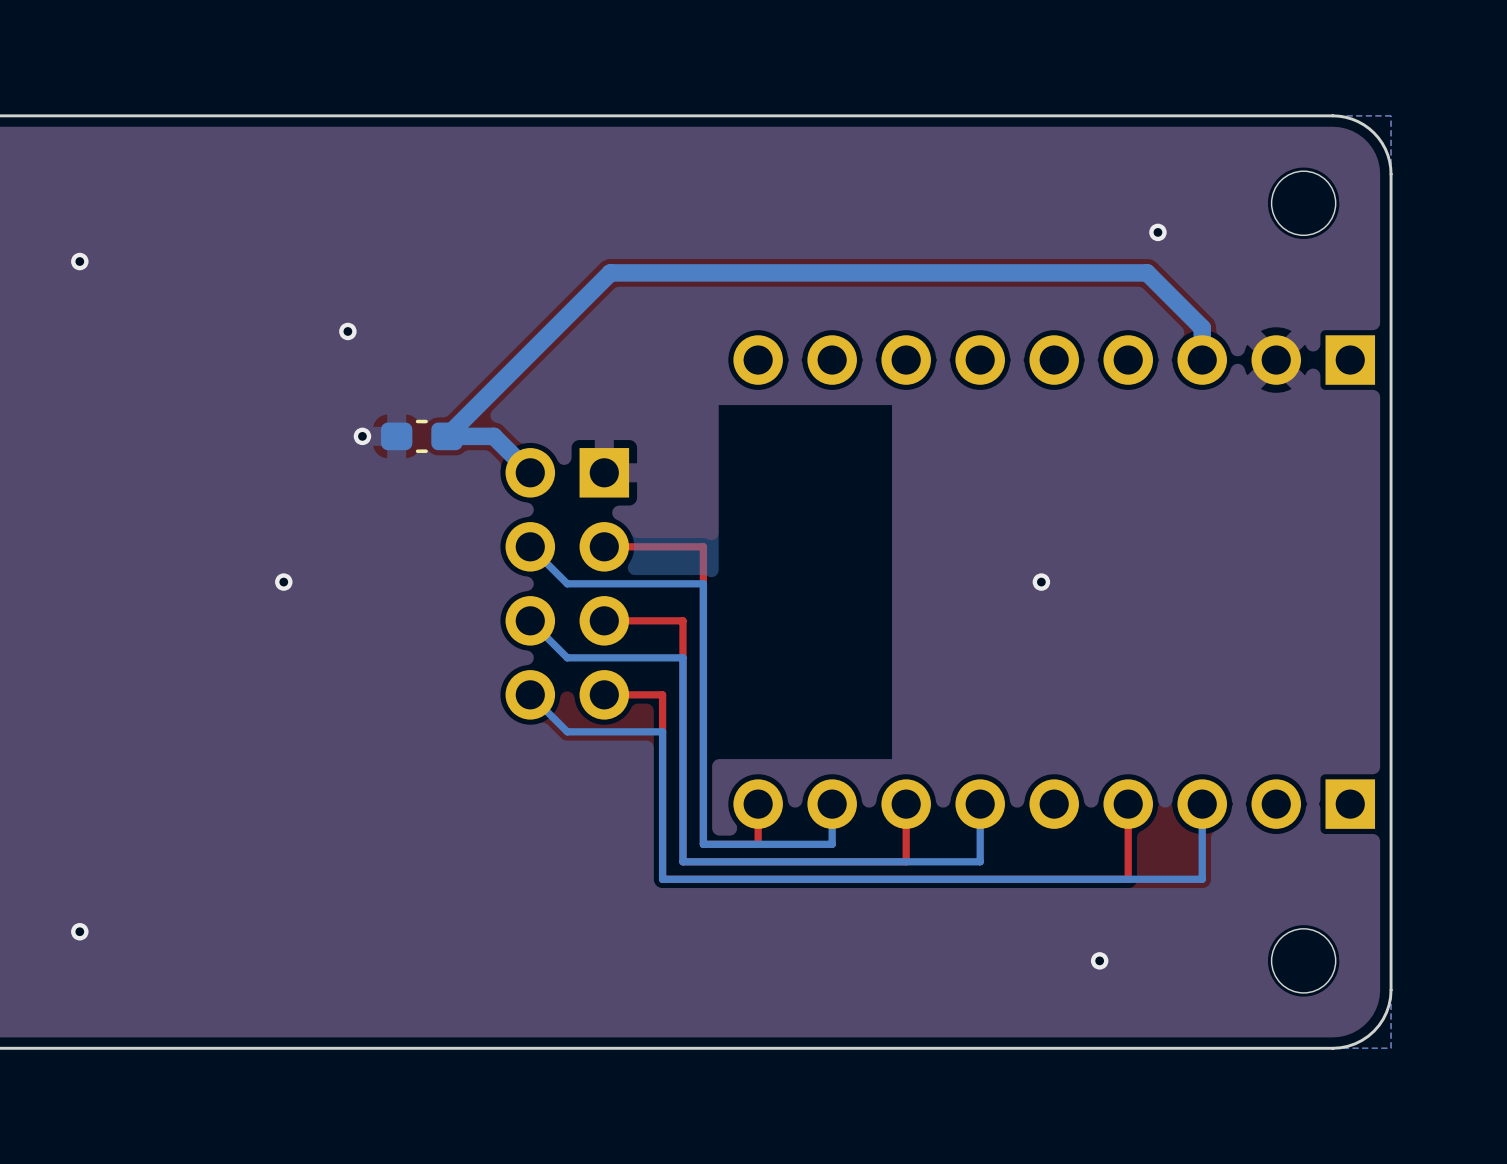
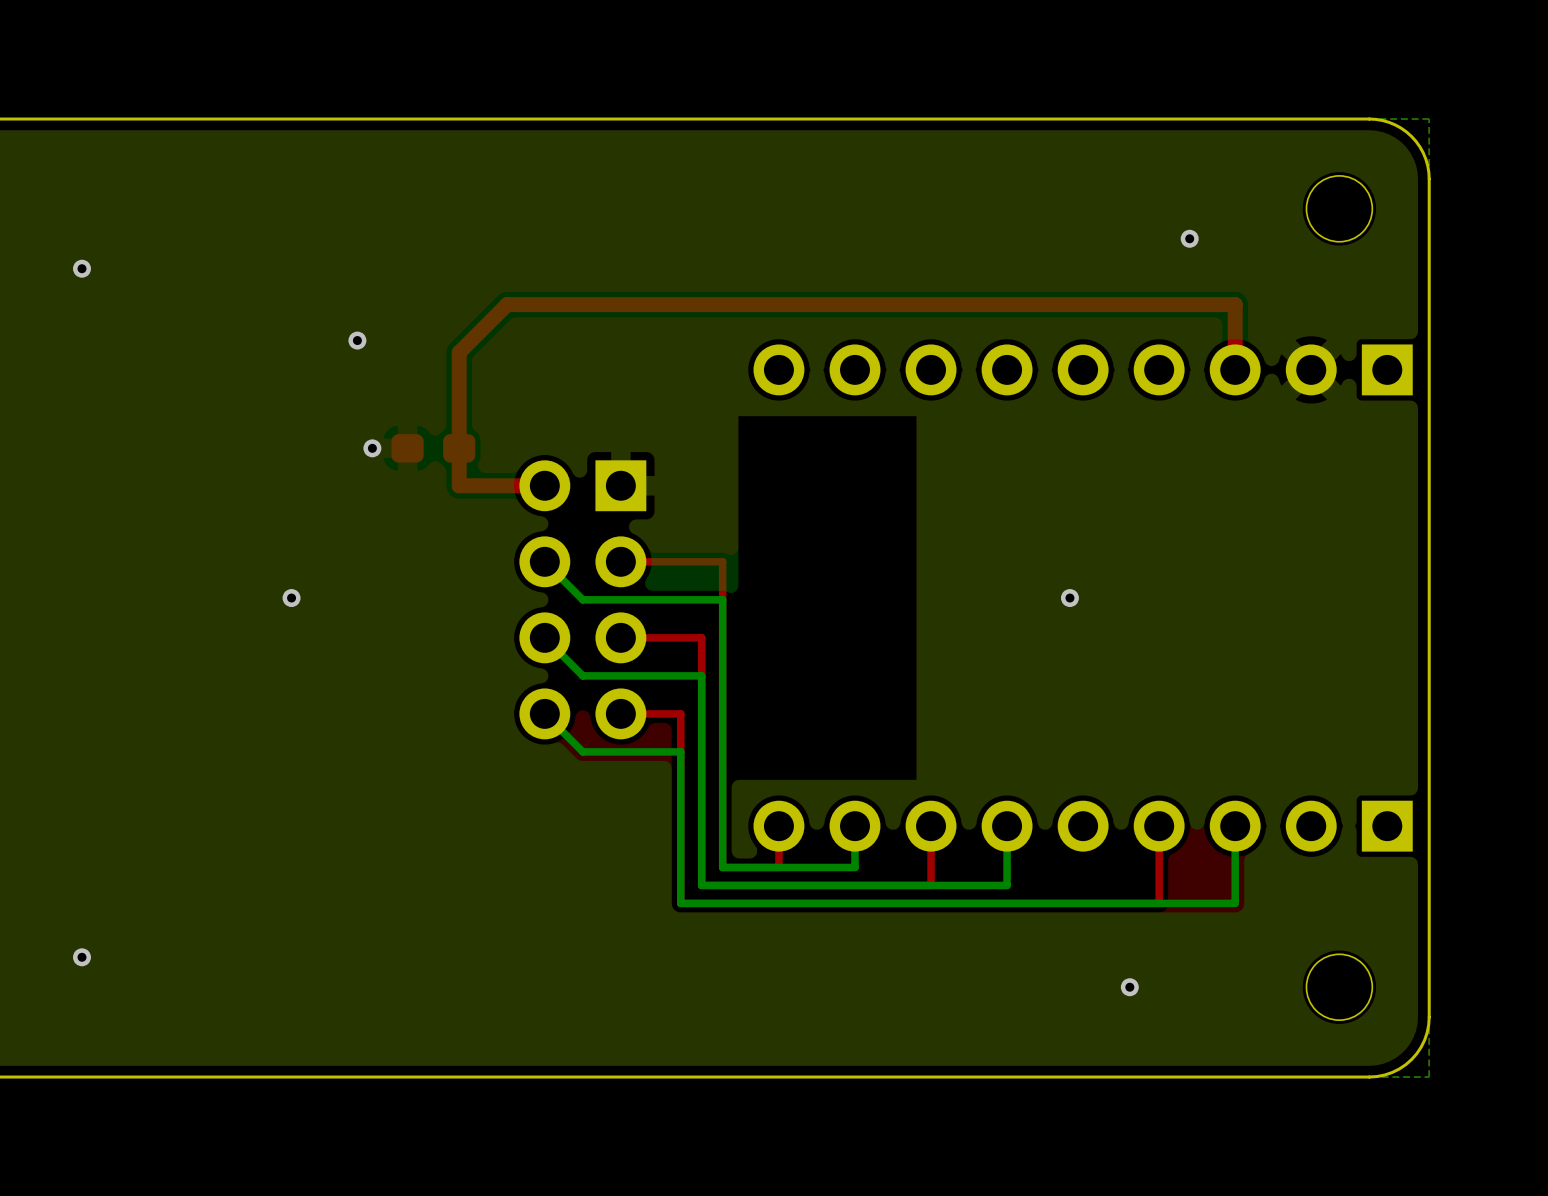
bottom track: (1202, 360) (1202, 327) (1147, 272) (610, 272) (446, 436) (493, 436) (530, 472) -> none
top track: none -> (1235, 369) (1235, 304) (507, 304) (459, 352) (459, 485) (544, 485)
part side: bottom (421, 436) -> top (433, 448)

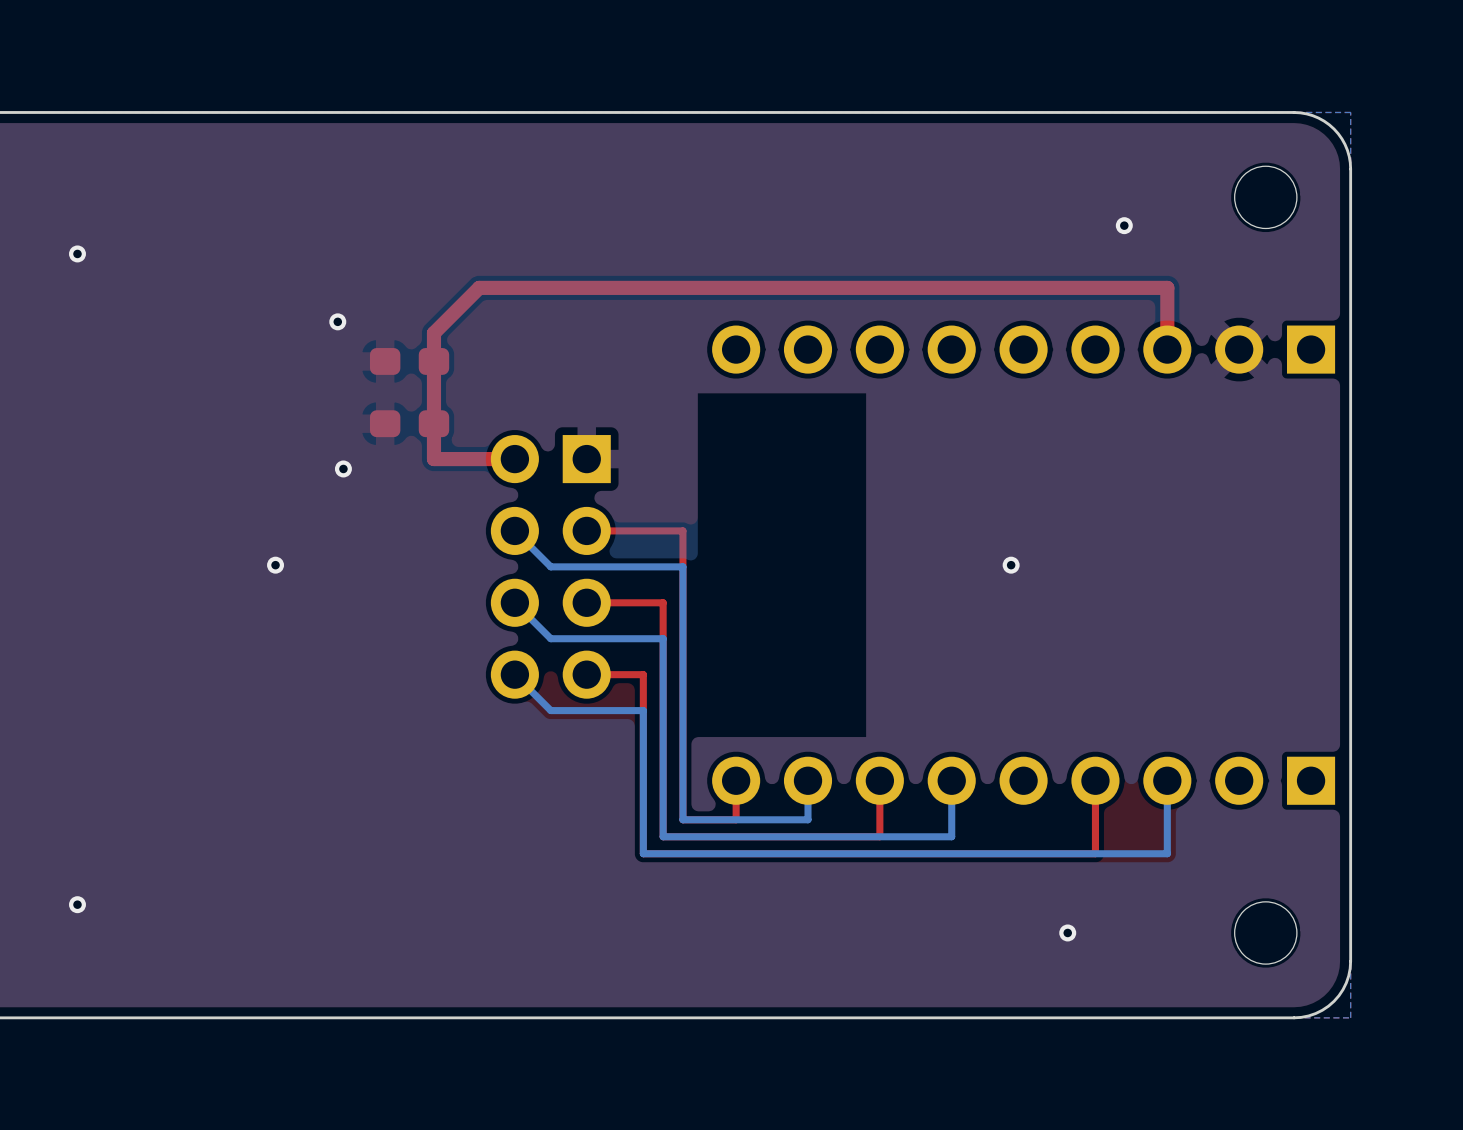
part: none -> (409, 361)
via position: (372, 448) -> (343, 468)

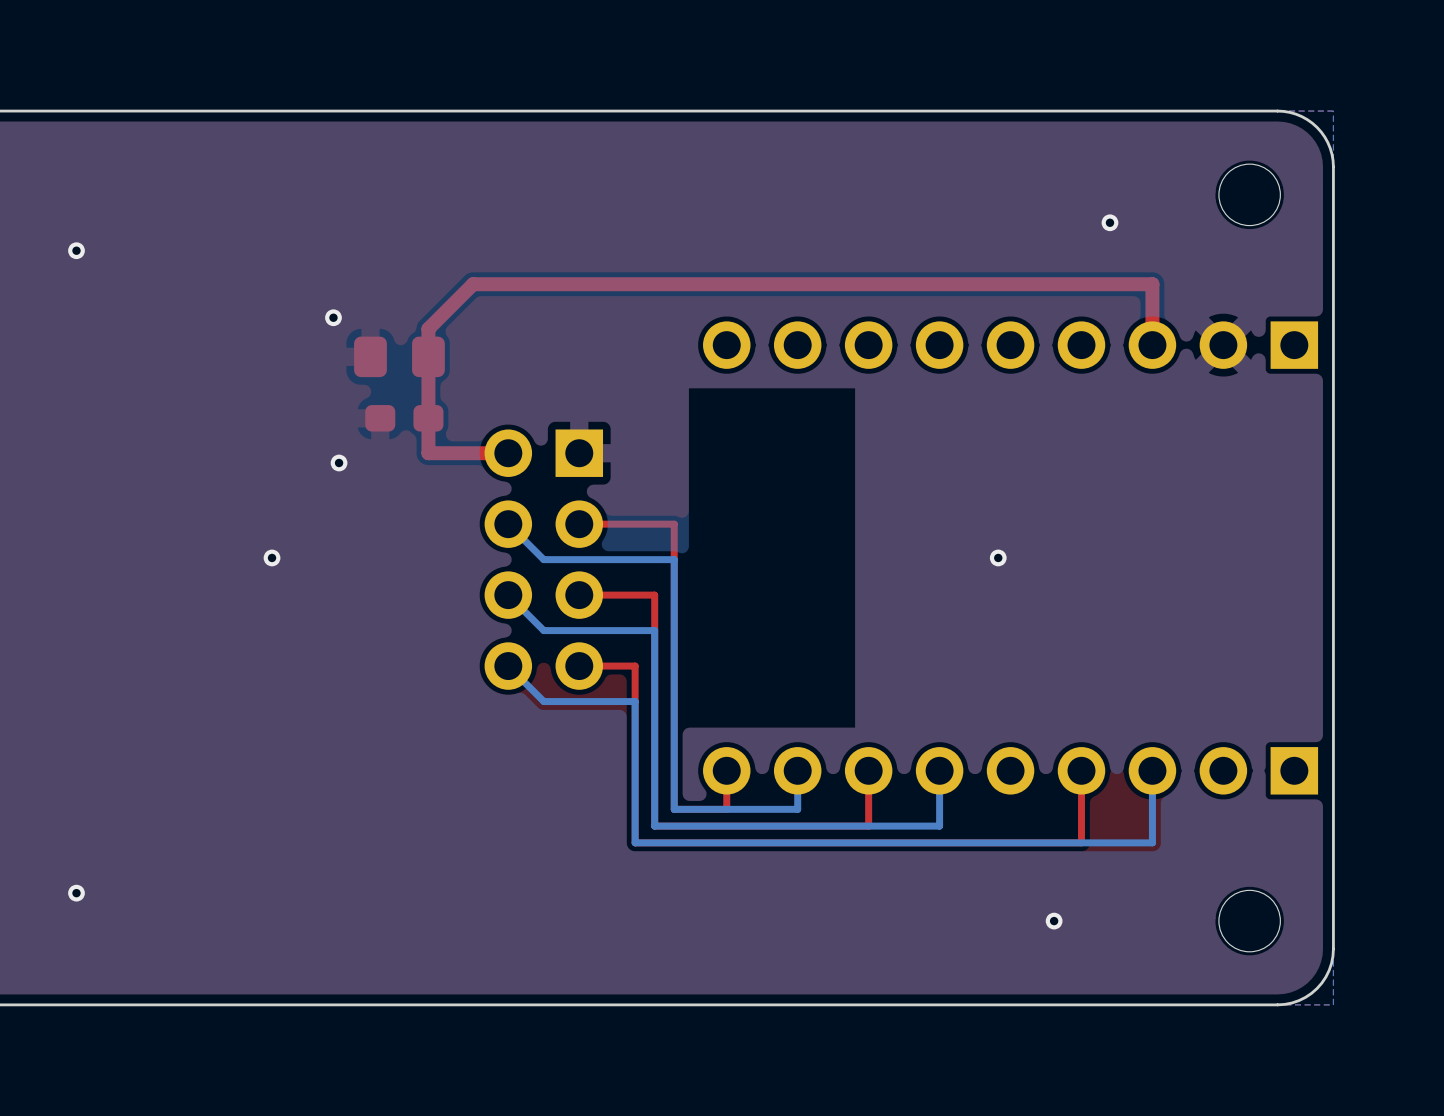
part footprint: [369, 348, 450, 375] -> [354, 336, 445, 378]

